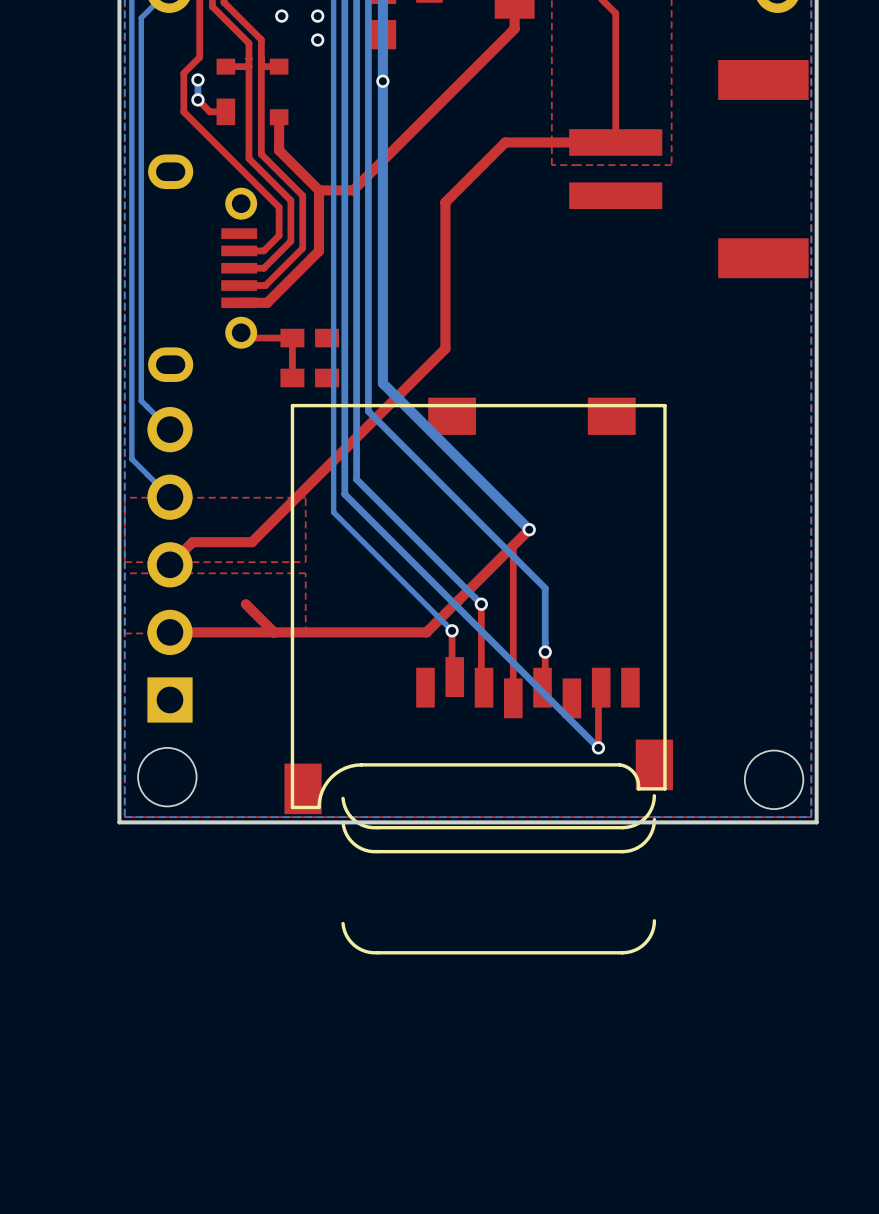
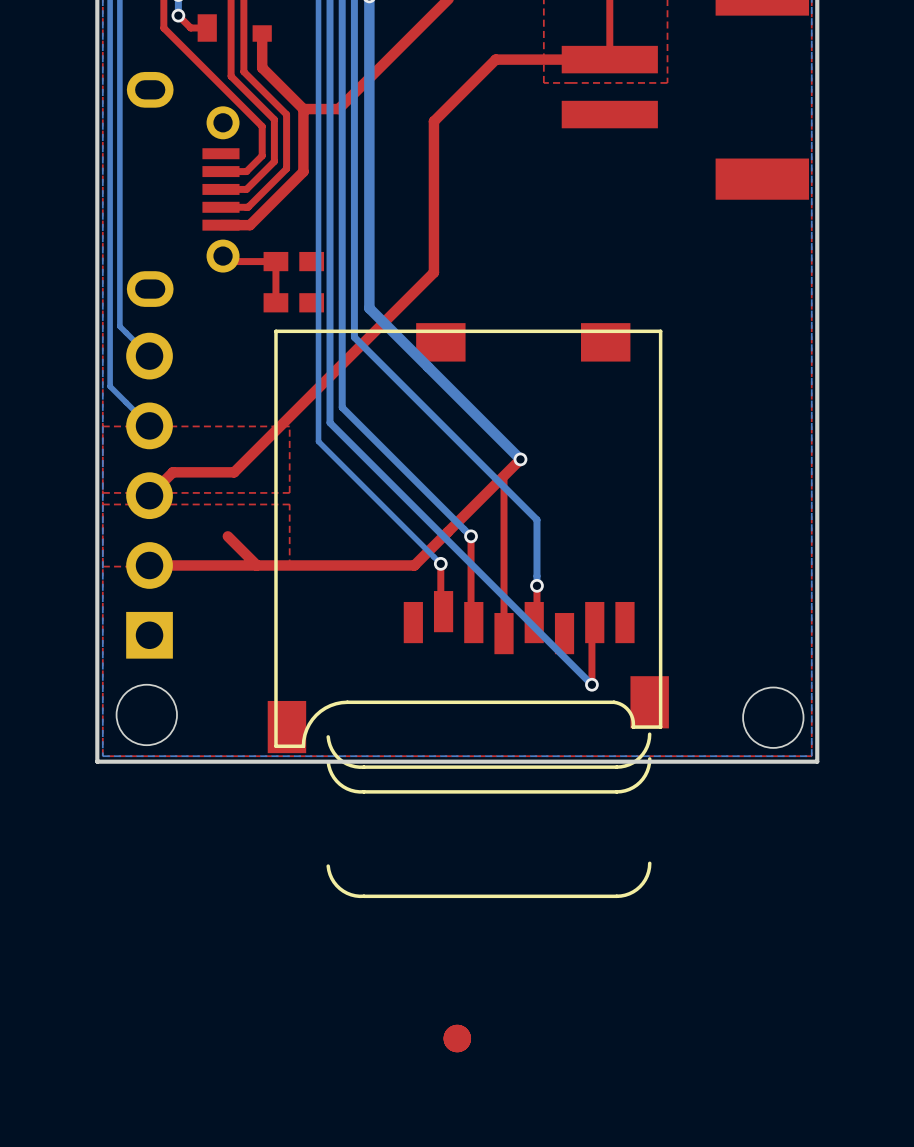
part: none -> (457, 1038)

